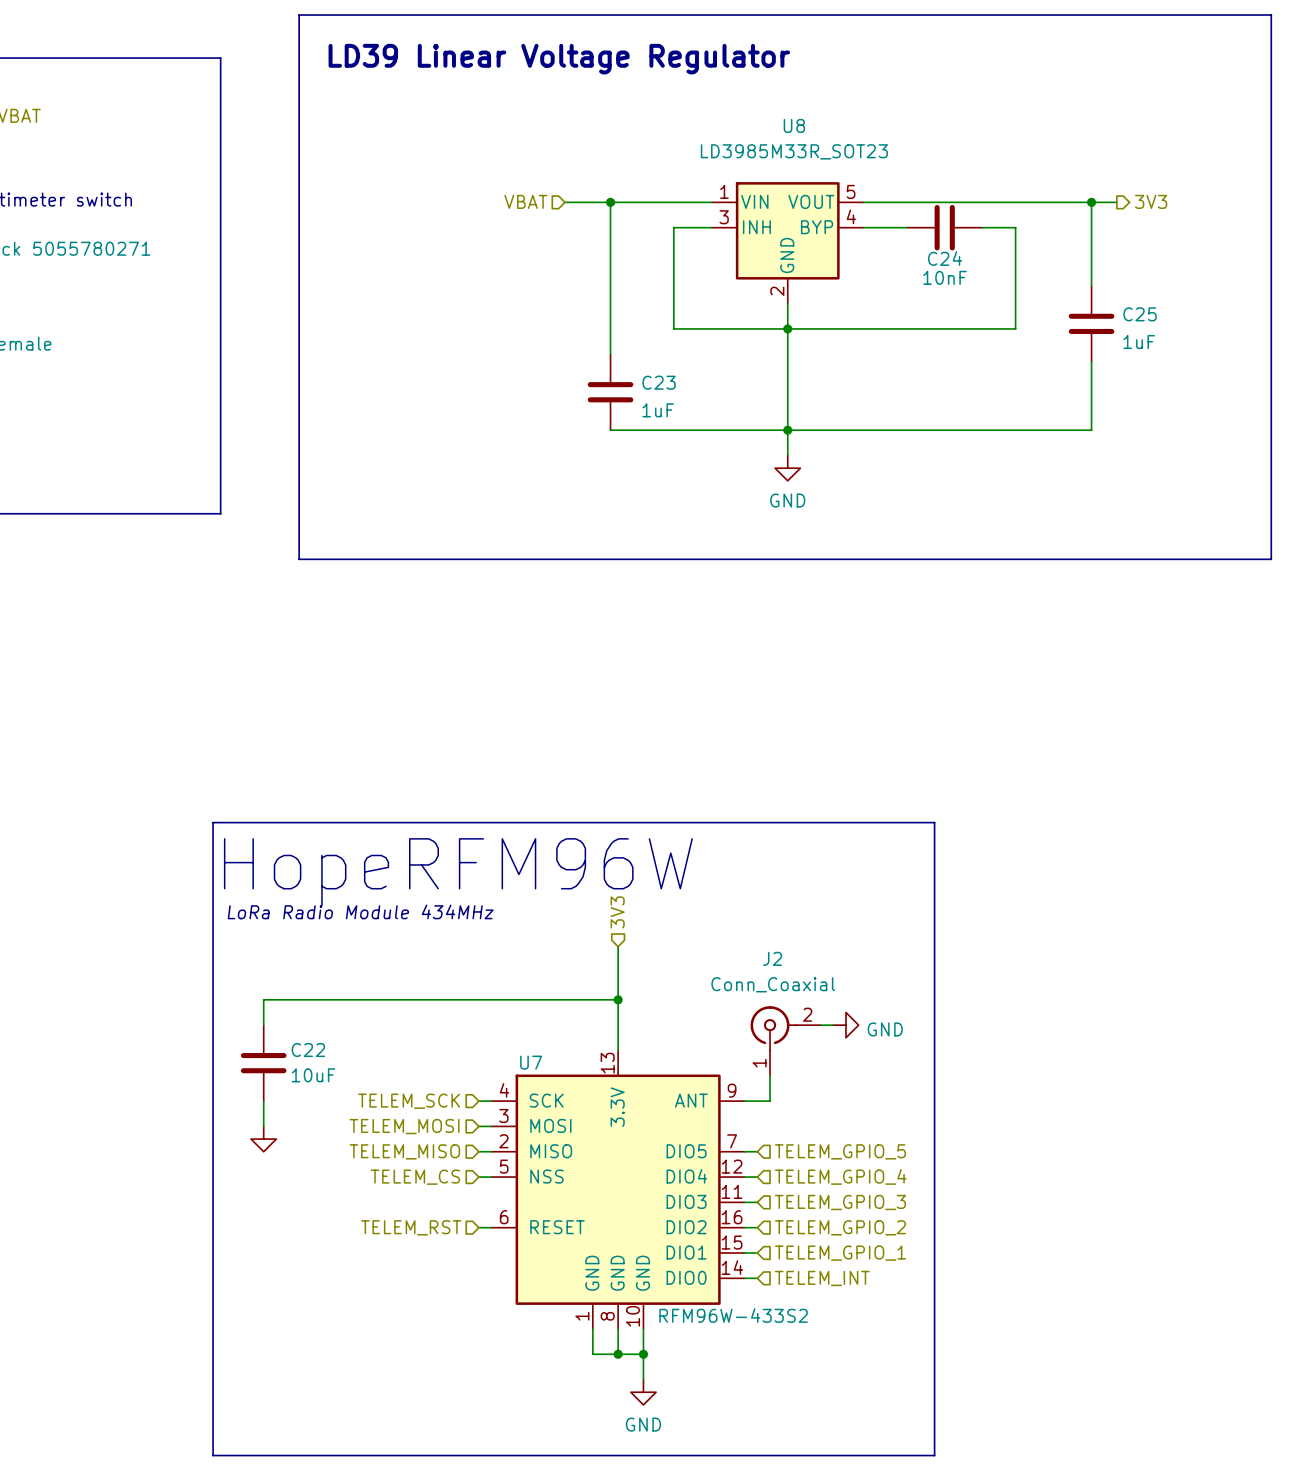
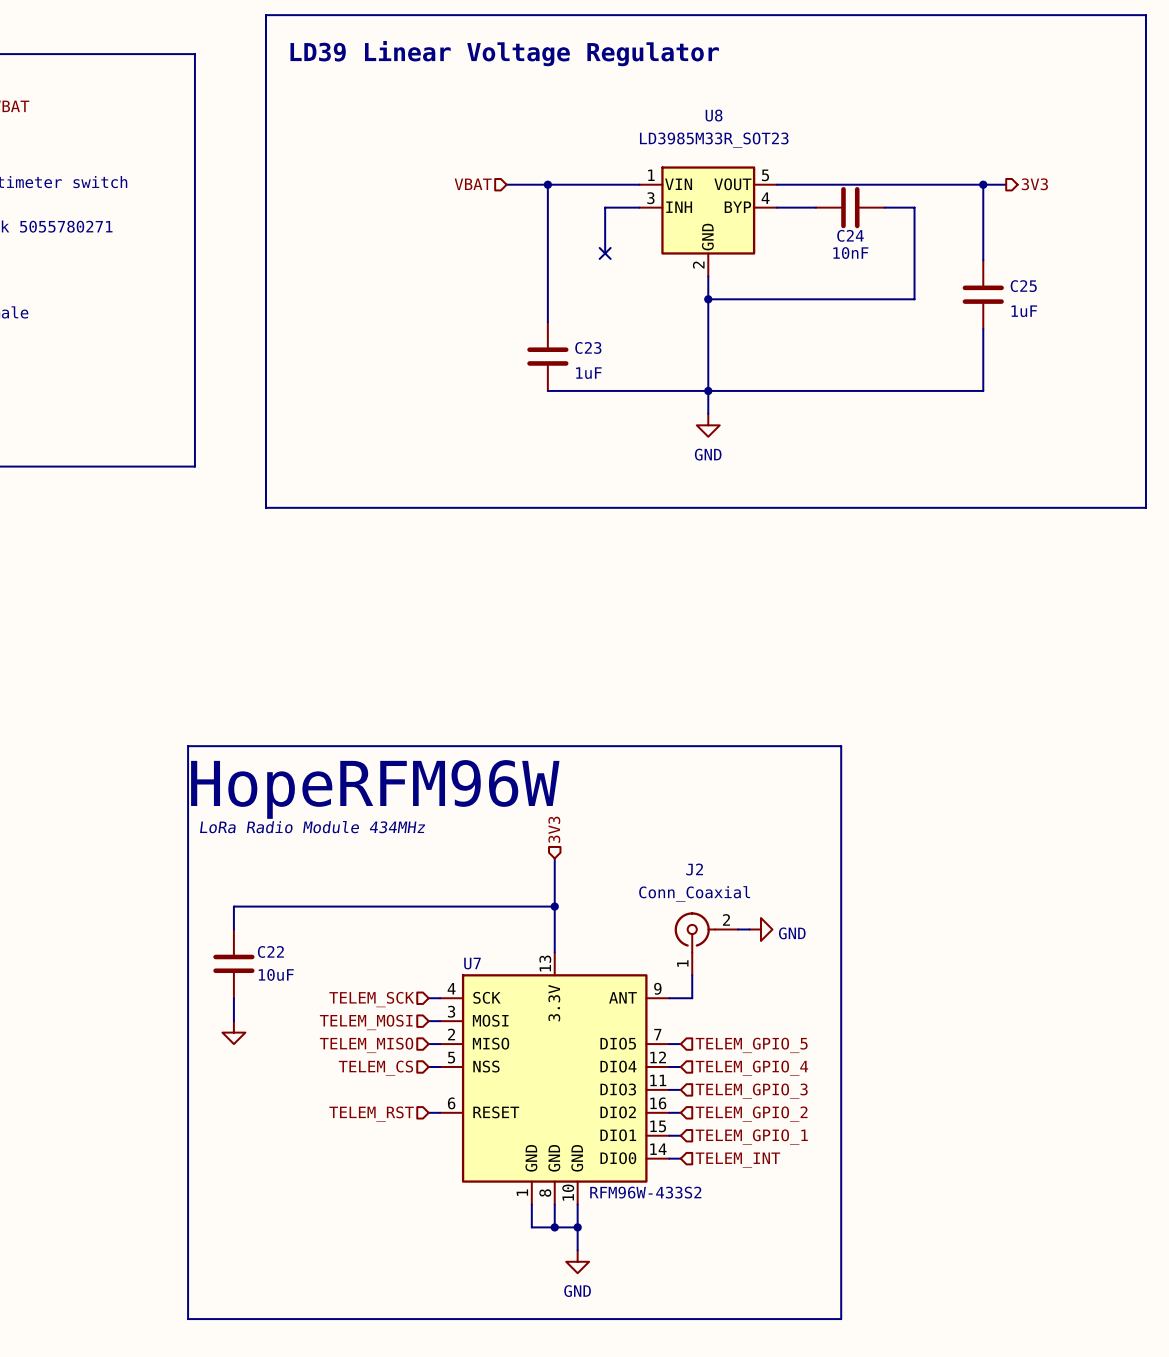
wire: (673, 278) (673, 328) (787, 328) -> none
no-connect mark: none -> (605, 253)

